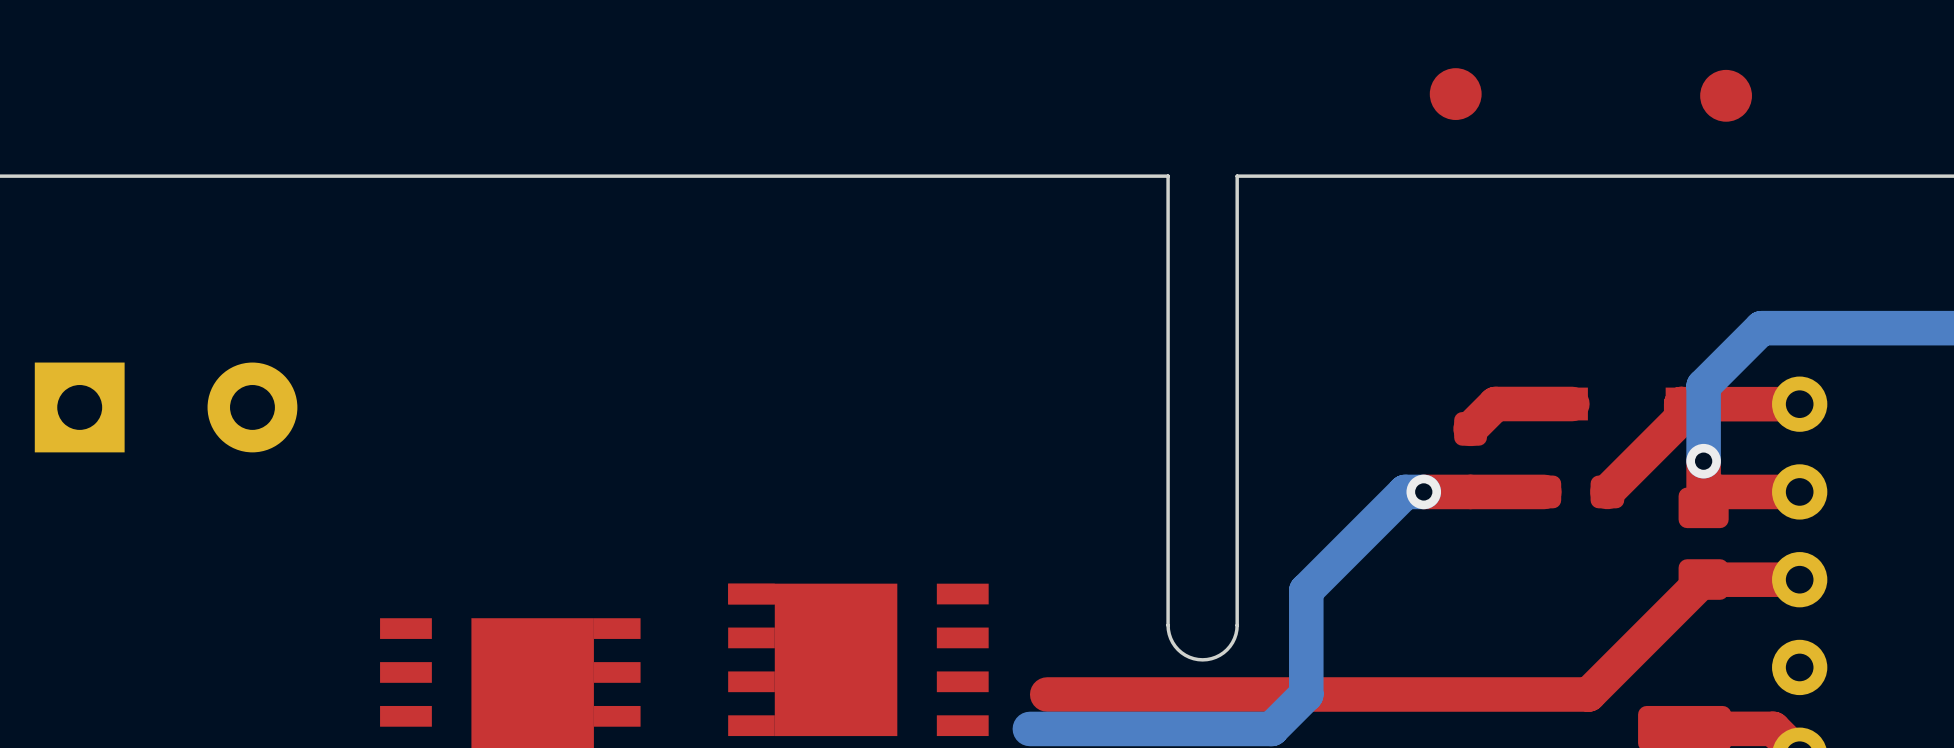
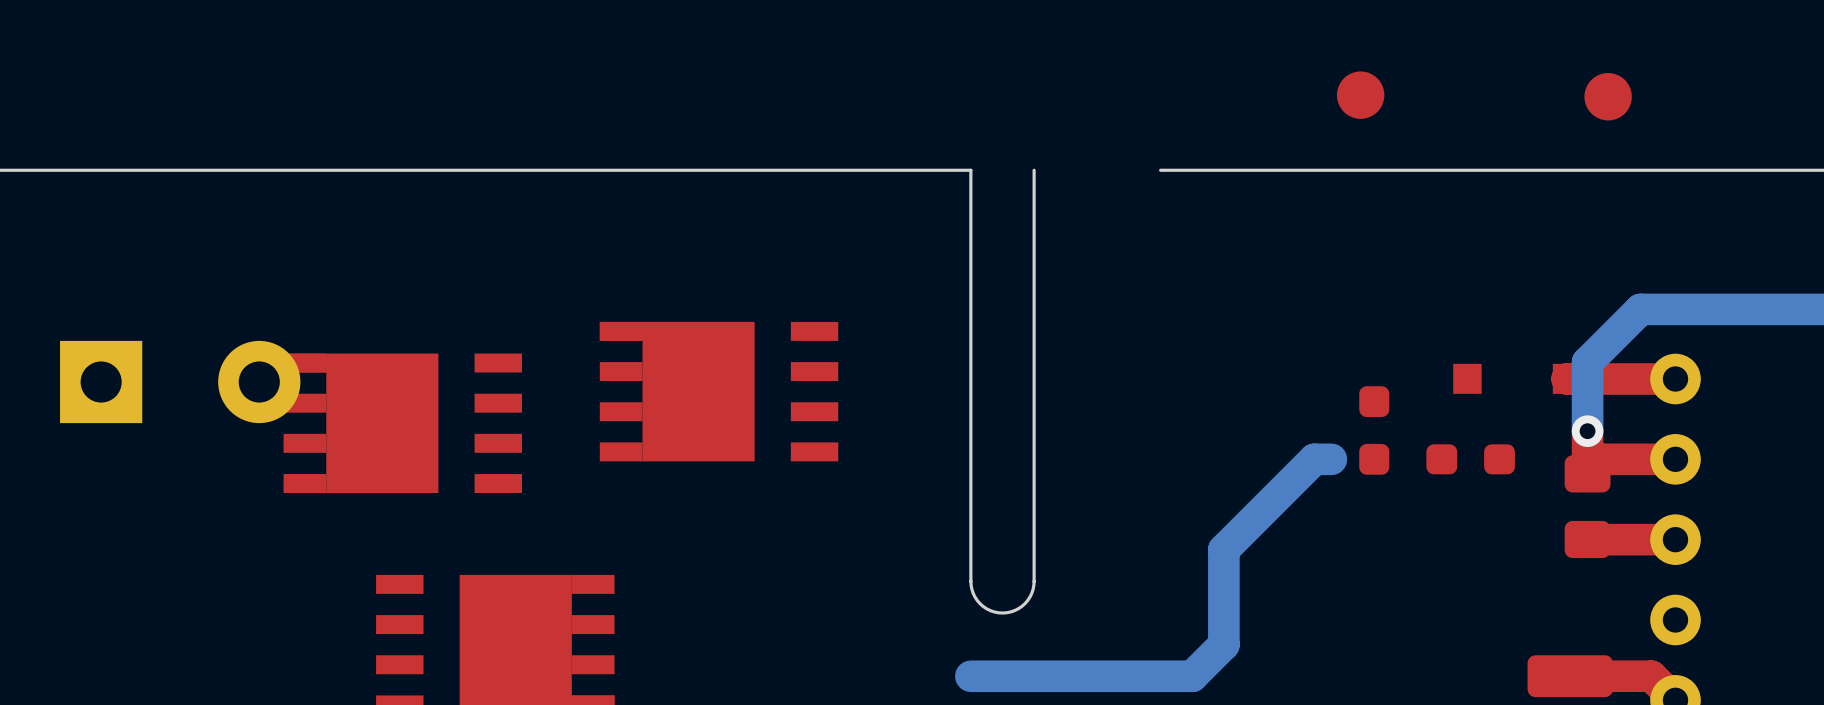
board edge: (1237, 176) (1236, 629) (1232, 642) (1227, 649) (1215, 657) (1202, 659) (1189, 657) (1178, 649) (1172, 642) (1168, 629) (1168, 176) (1029, 176) -> (1034, 170) (1033, 585) (1029, 597) (1024, 603) (1014, 610) (1002, 613) (990, 610) (980, 603) (975, 597) (971, 585) (970, 170)
top track: (1572, 404) (1495, 404) (1470, 428) -> none
top track: (1681, 404) (1681, 418) (1607, 491) -> none
part: none -> (719, 391)
part: none -> (402, 423)
via: (1423, 491) -> none
top track: (1544, 491) (1423, 491) -> none
top track: (1703, 579) (1588, 694) (1047, 694) -> none
part: (858, 659) -> none

